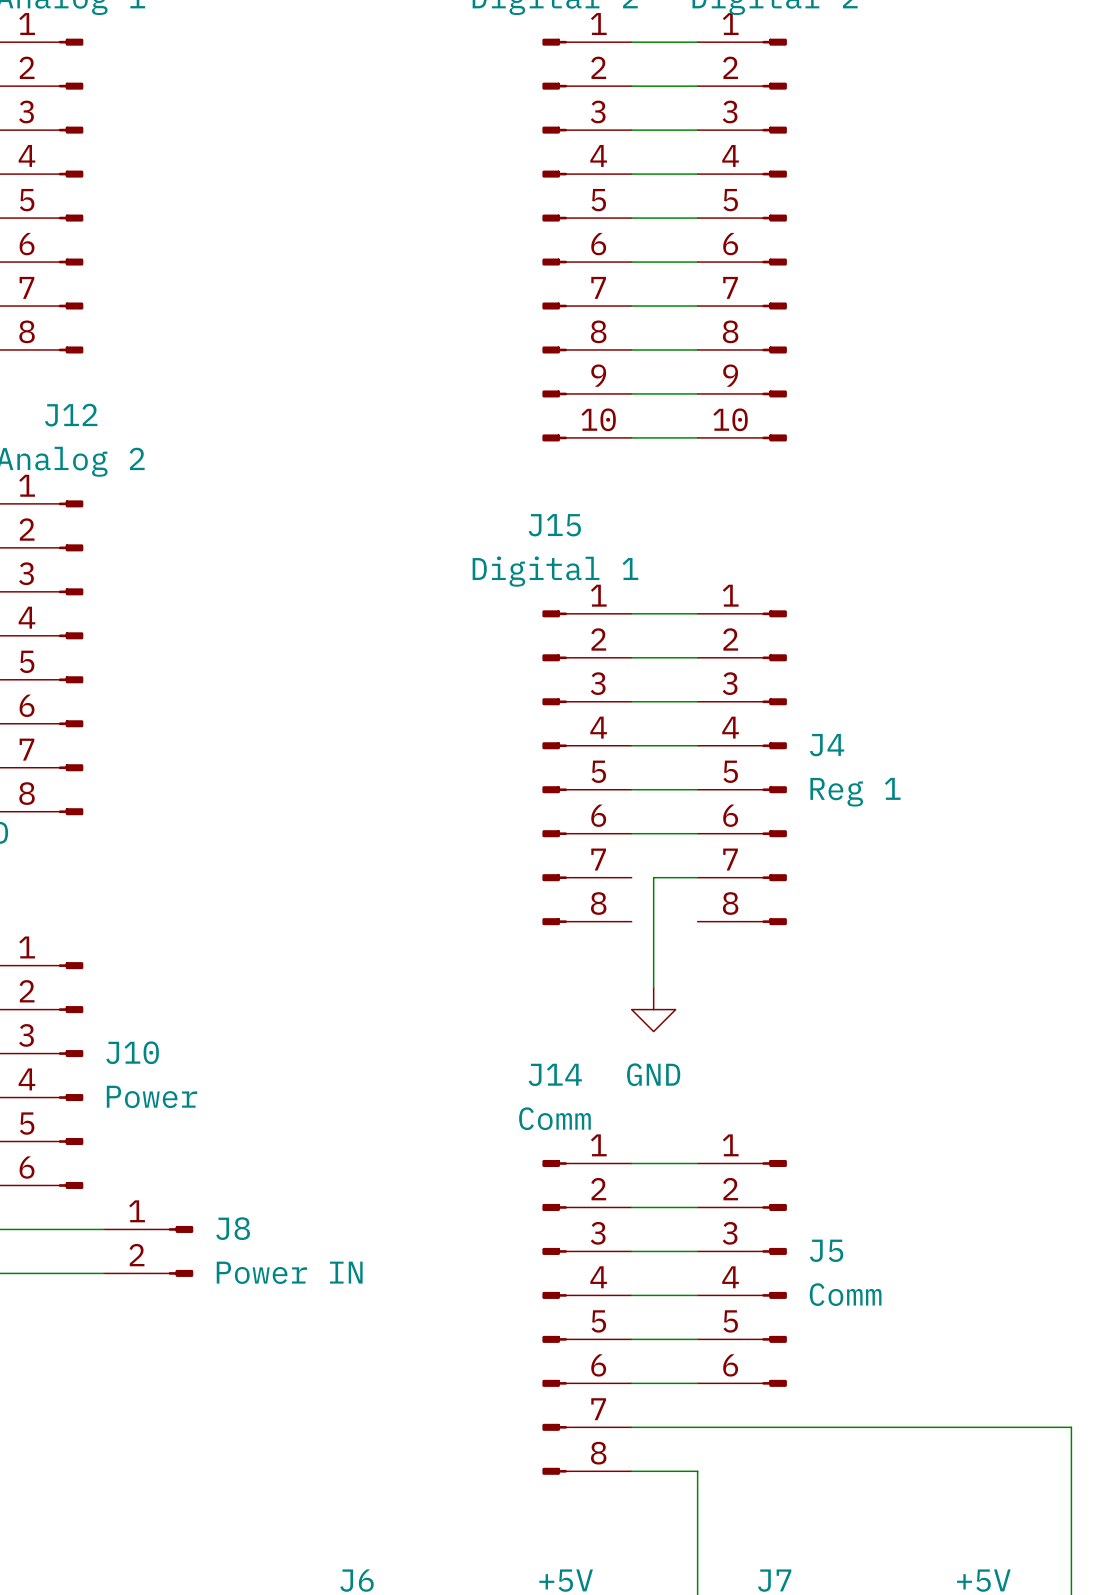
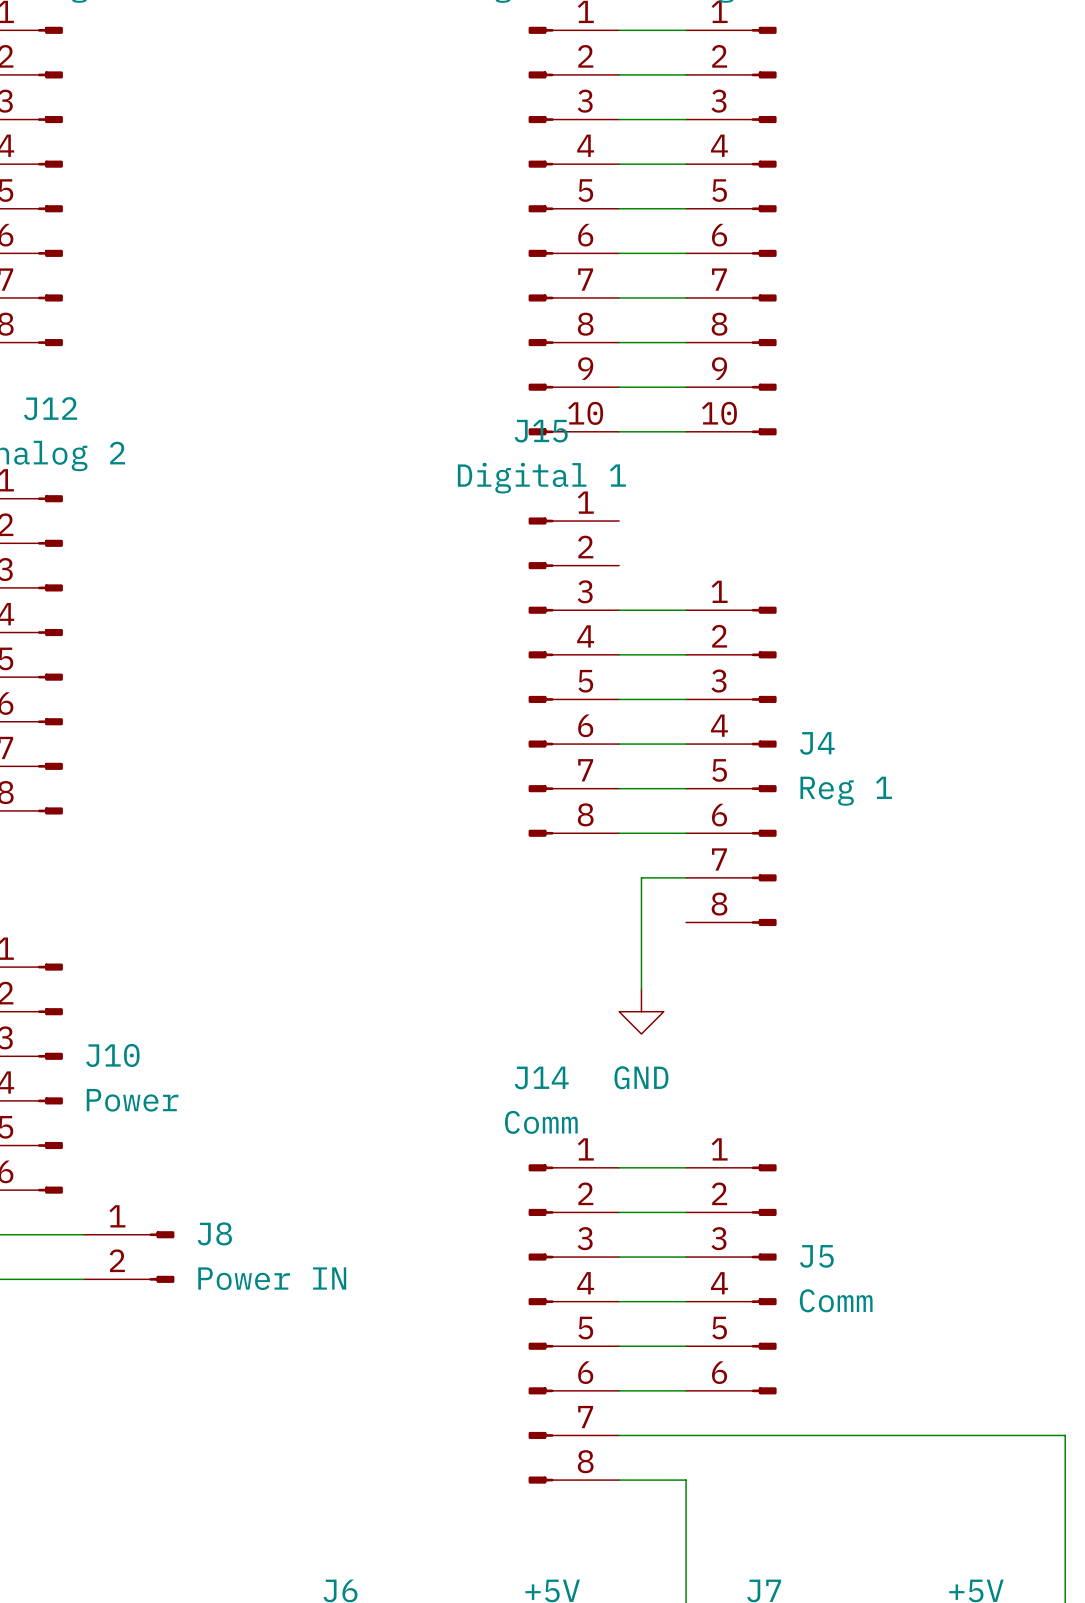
J15 position: (587, 767) -> (573, 677)

